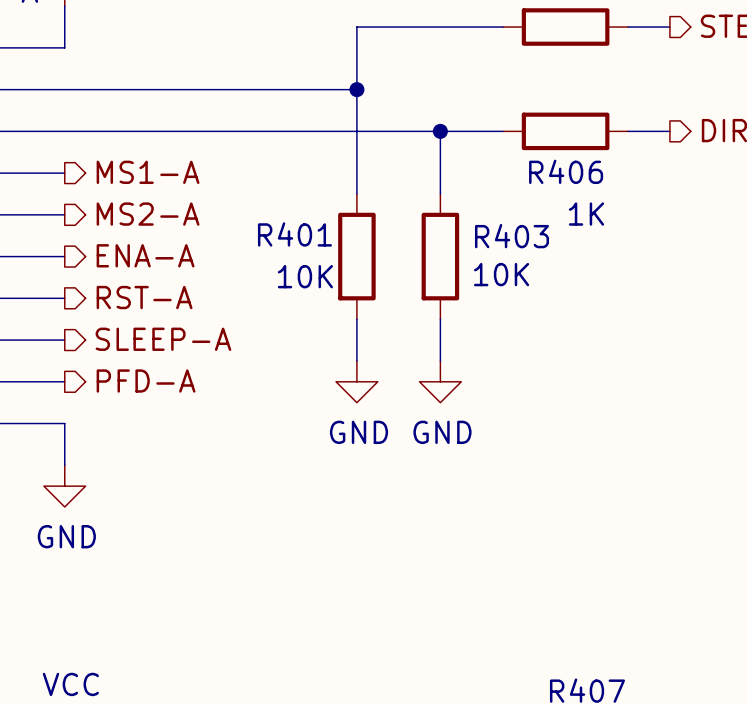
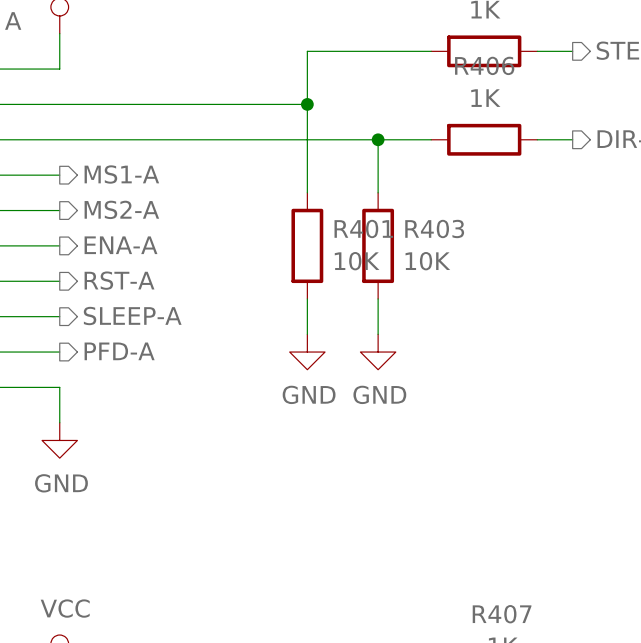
R406 name position: R406 (566, 171) -> R406 (484, 65)
R406 value position: 1K (586, 214) -> 1K (485, 98)
R401 name position: R401 (294, 234) -> R401 (363, 228)
R401 value position: 10K (305, 276) -> 10K (357, 261)

